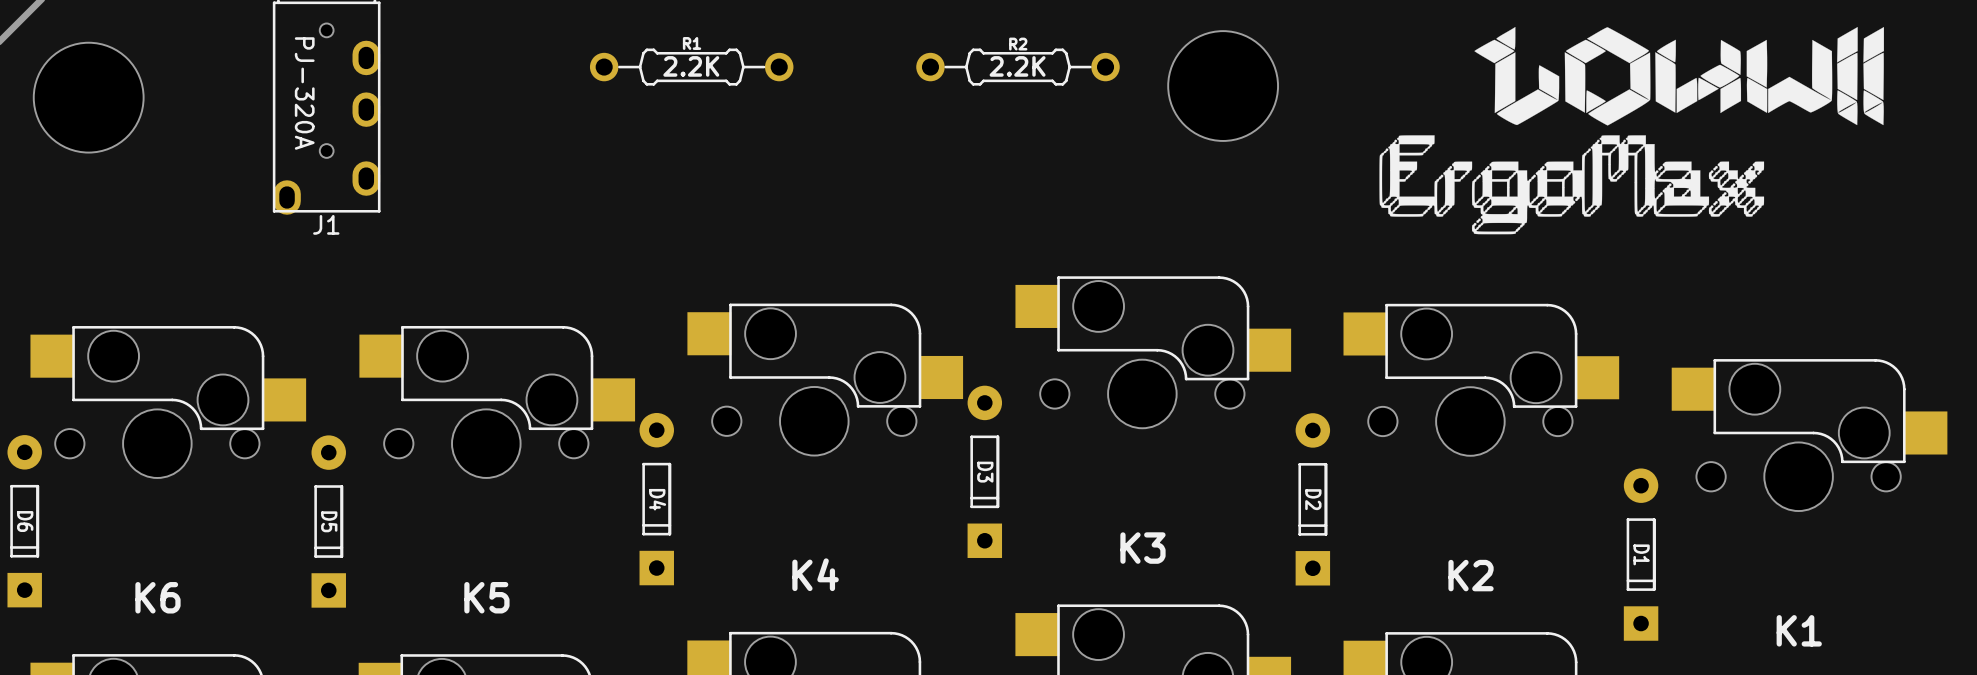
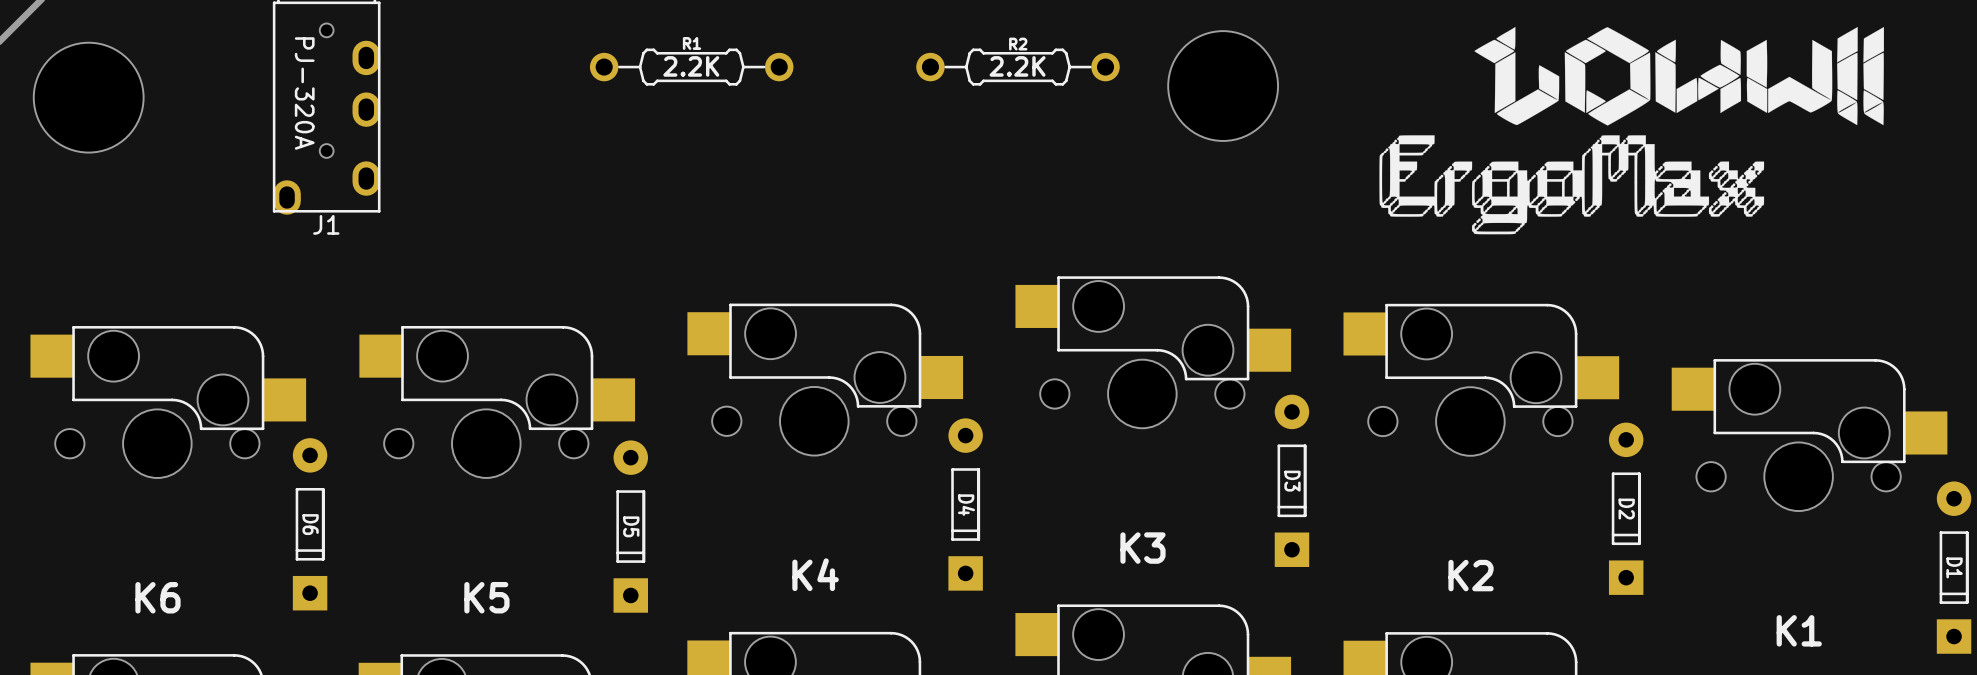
D3 position: (984, 471) -> (1291, 480)
D4 position: (656, 499) -> (965, 504)
D2 position: (1312, 499) -> (1626, 508)
D6 position: (24, 521) -> (310, 524)
D5 position: (328, 521) -> (630, 526)
D1 position: (1641, 554) -> (1954, 567)

